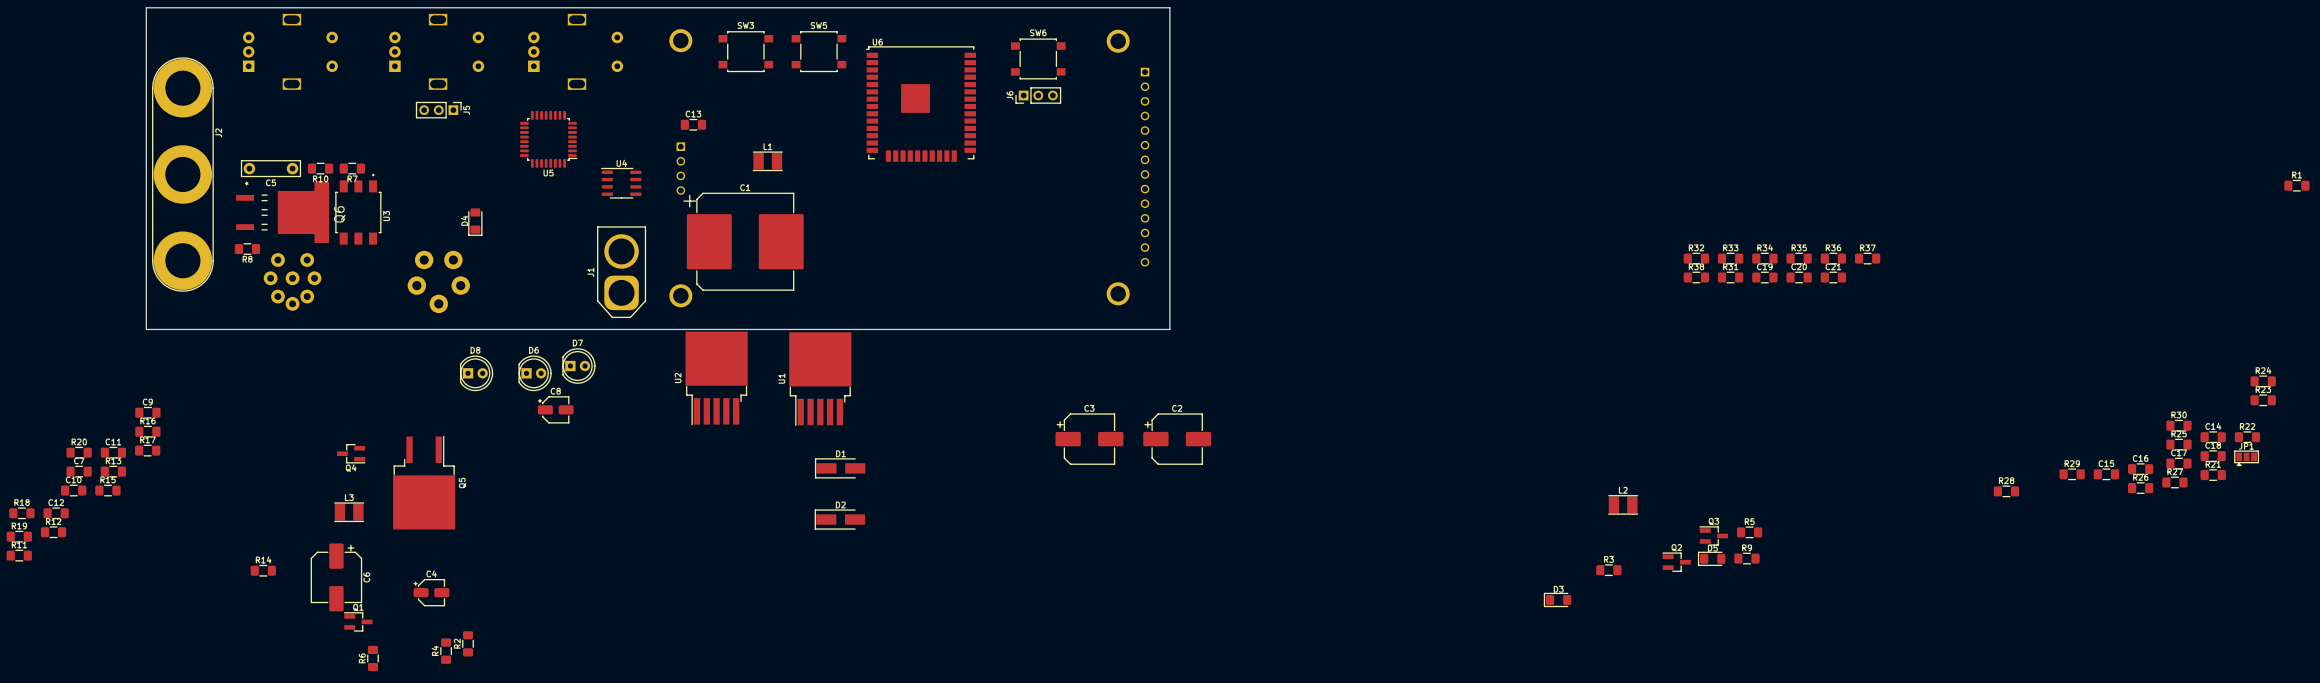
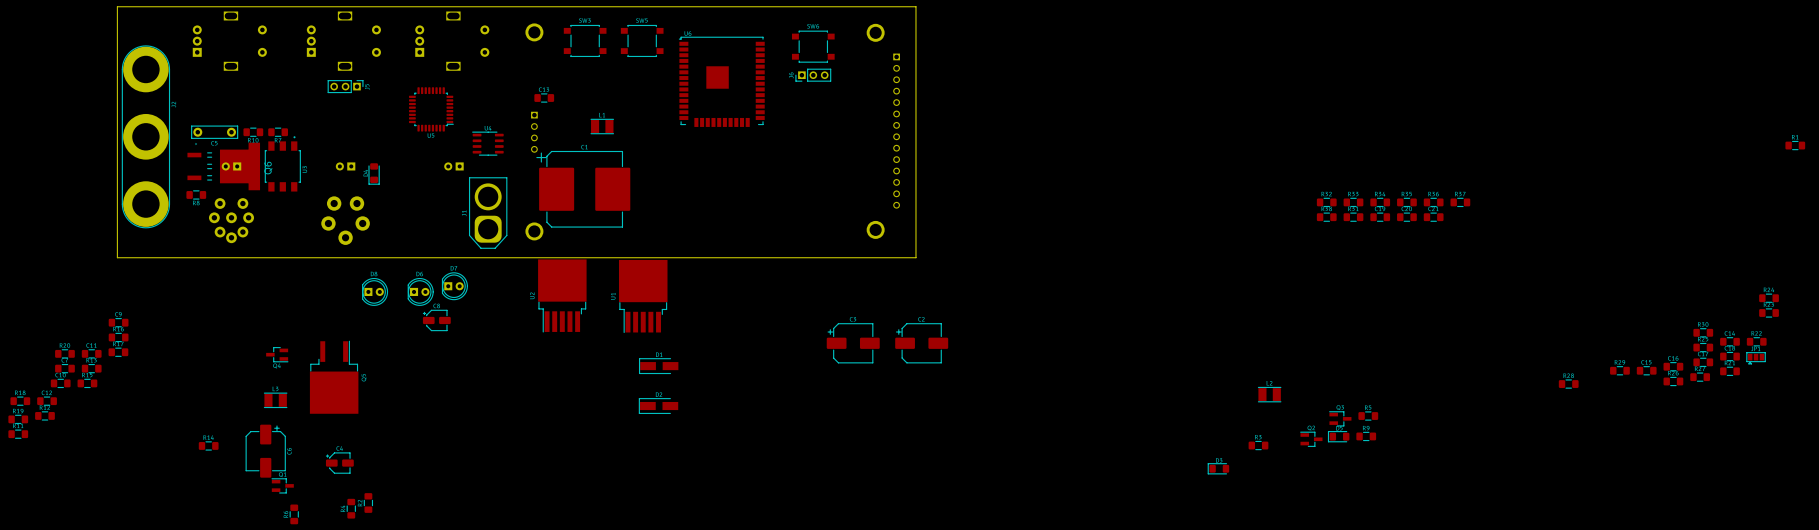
part: none -> (231, 166)
part: none -> (345, 166)
part: none -> (453, 166)

